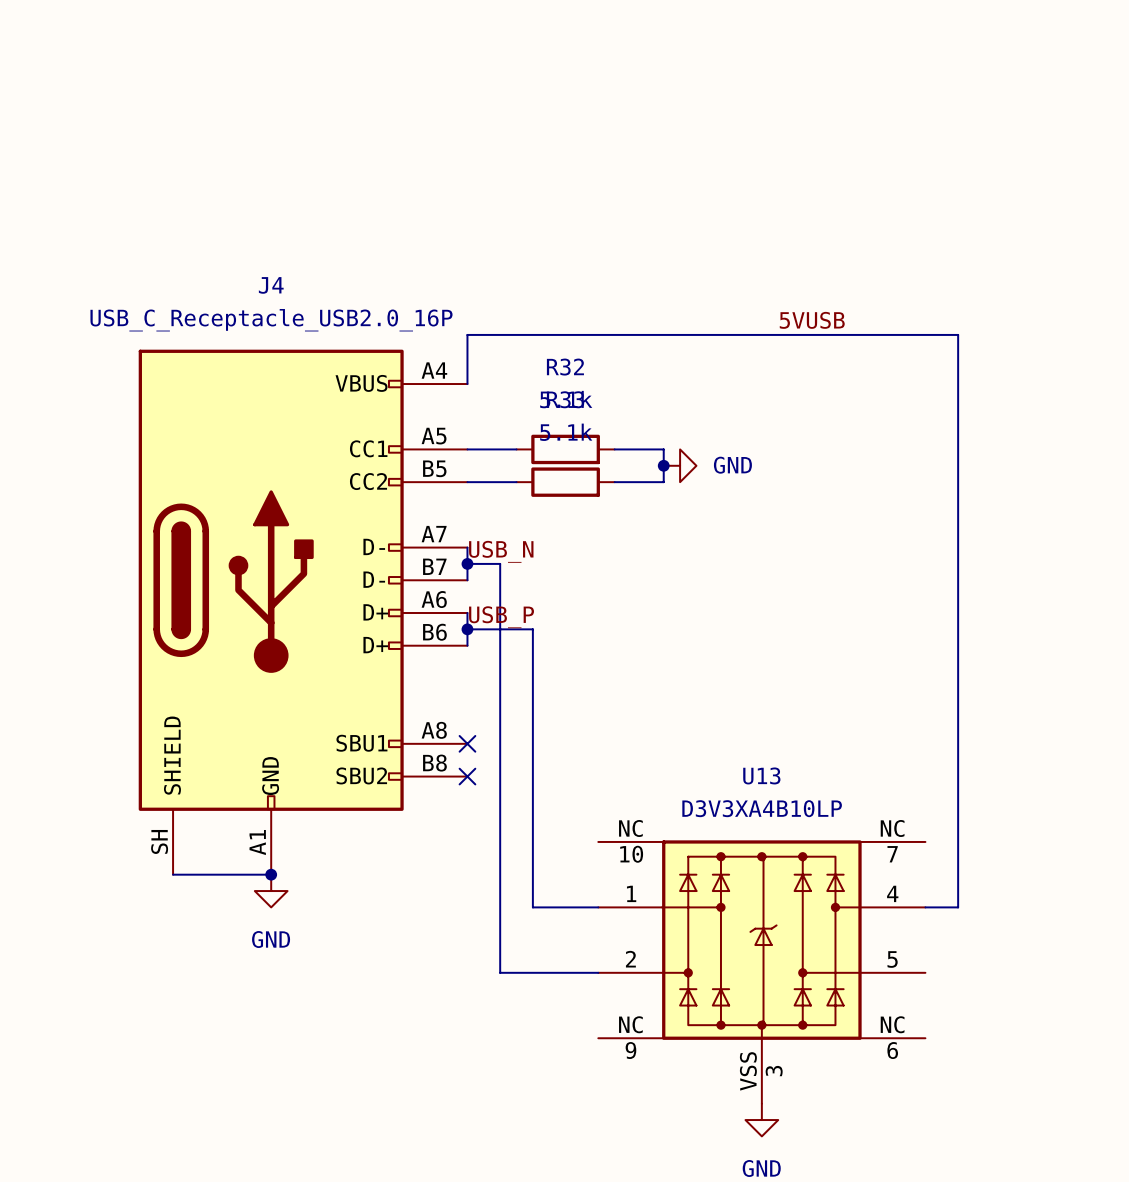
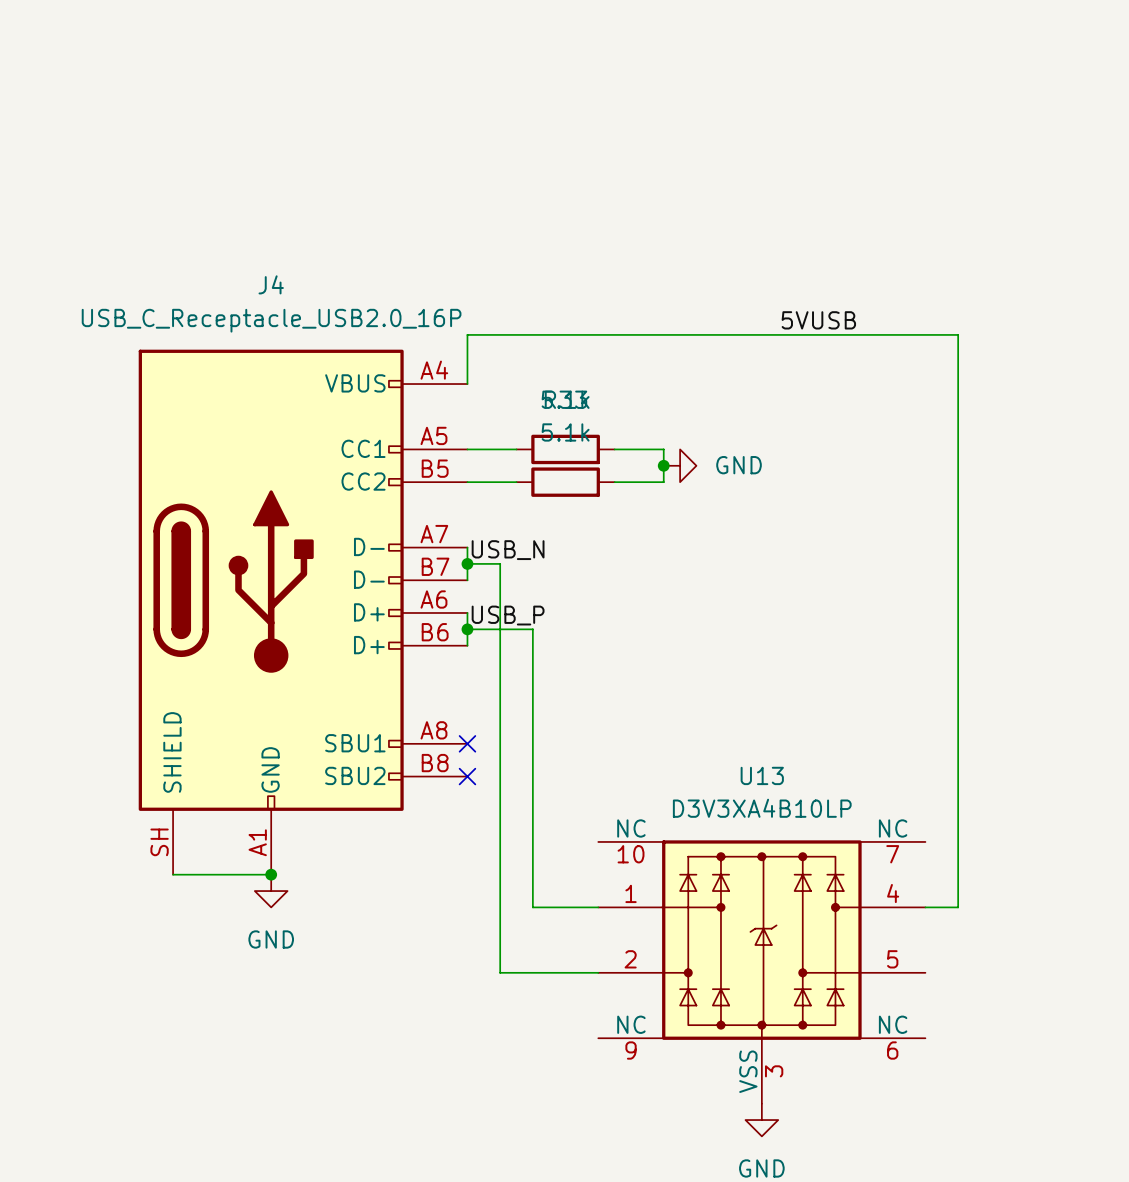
R32 name: R32 (565, 367) -> none

